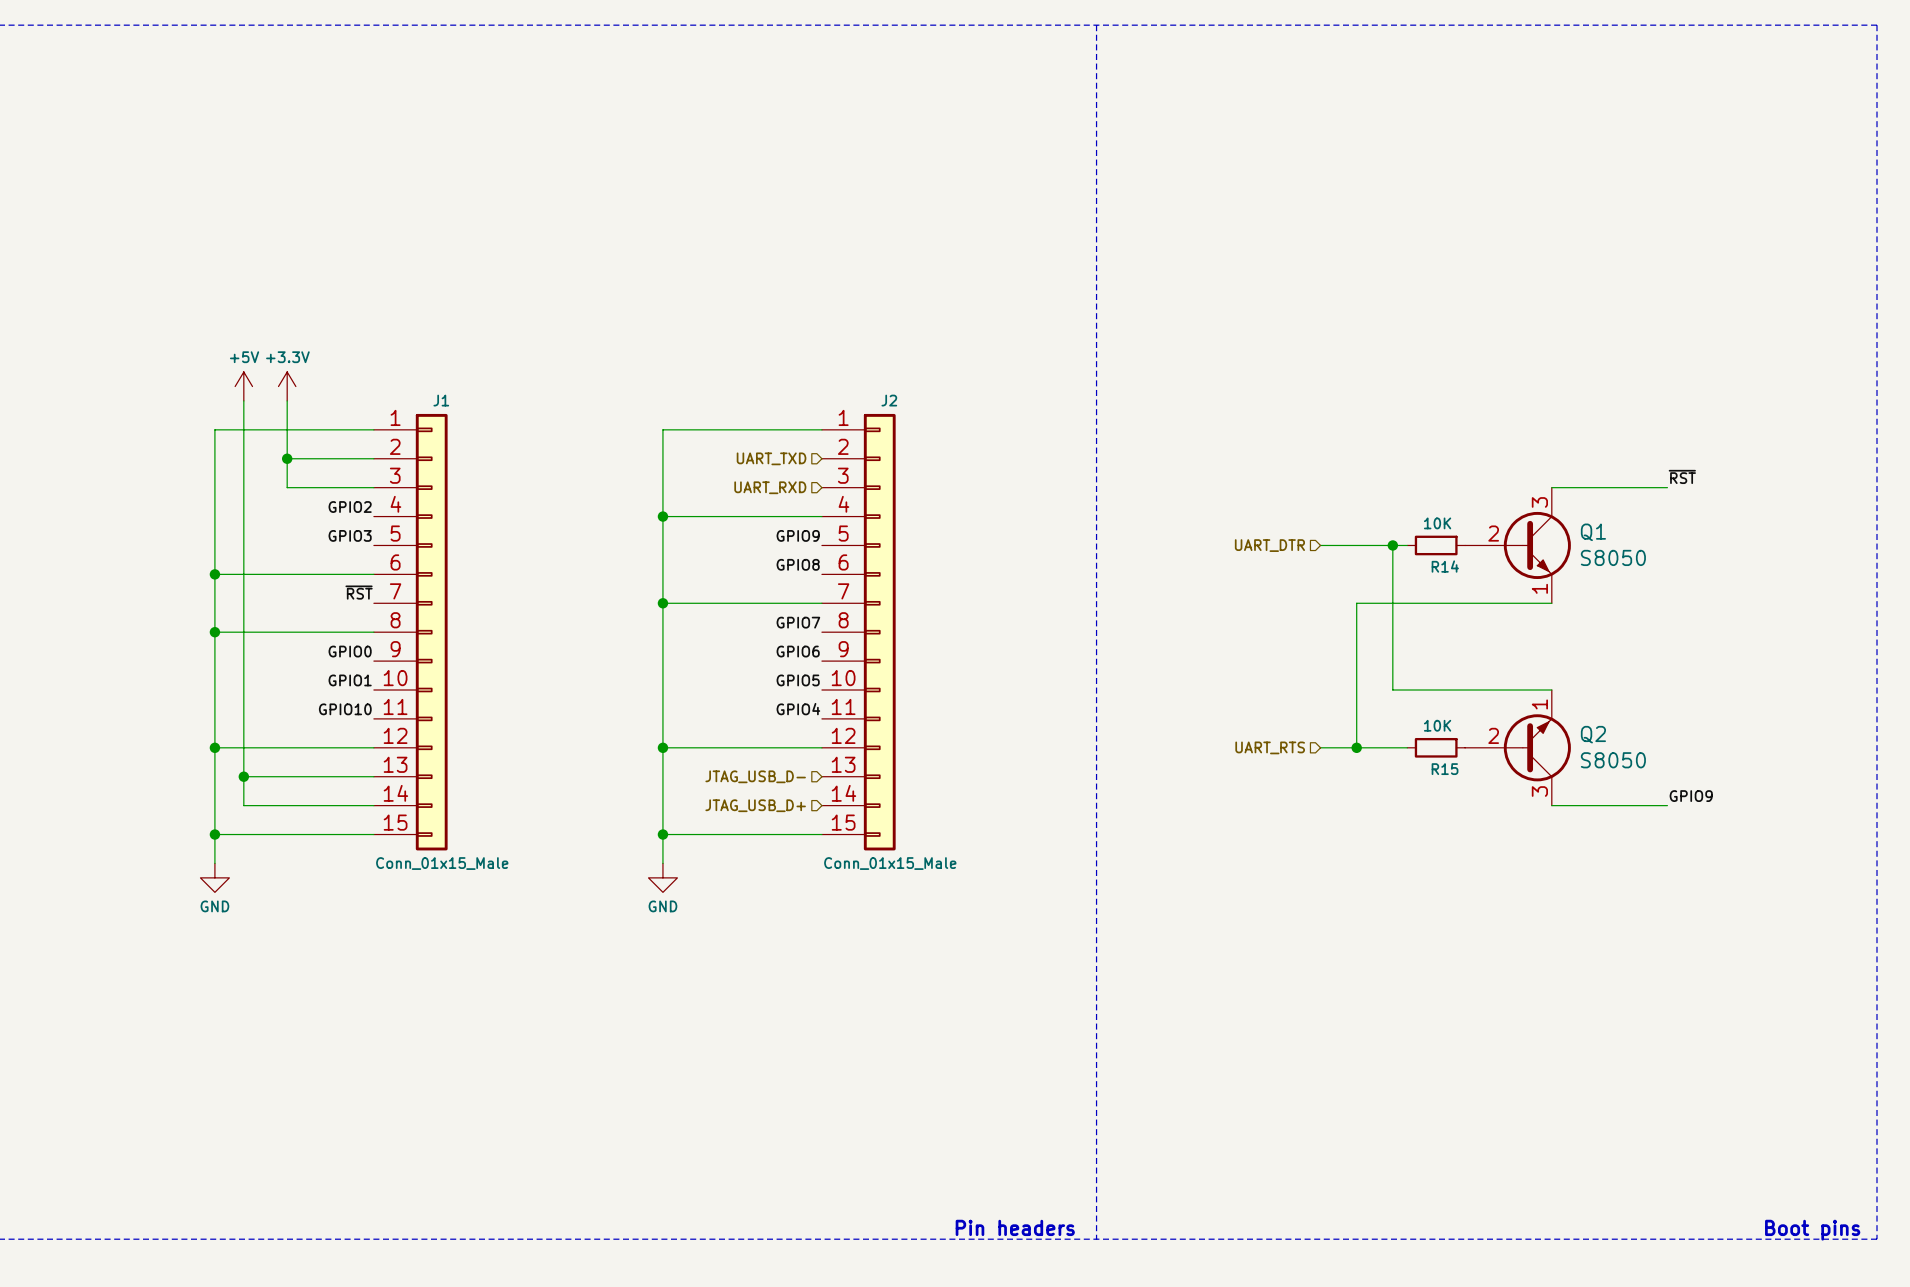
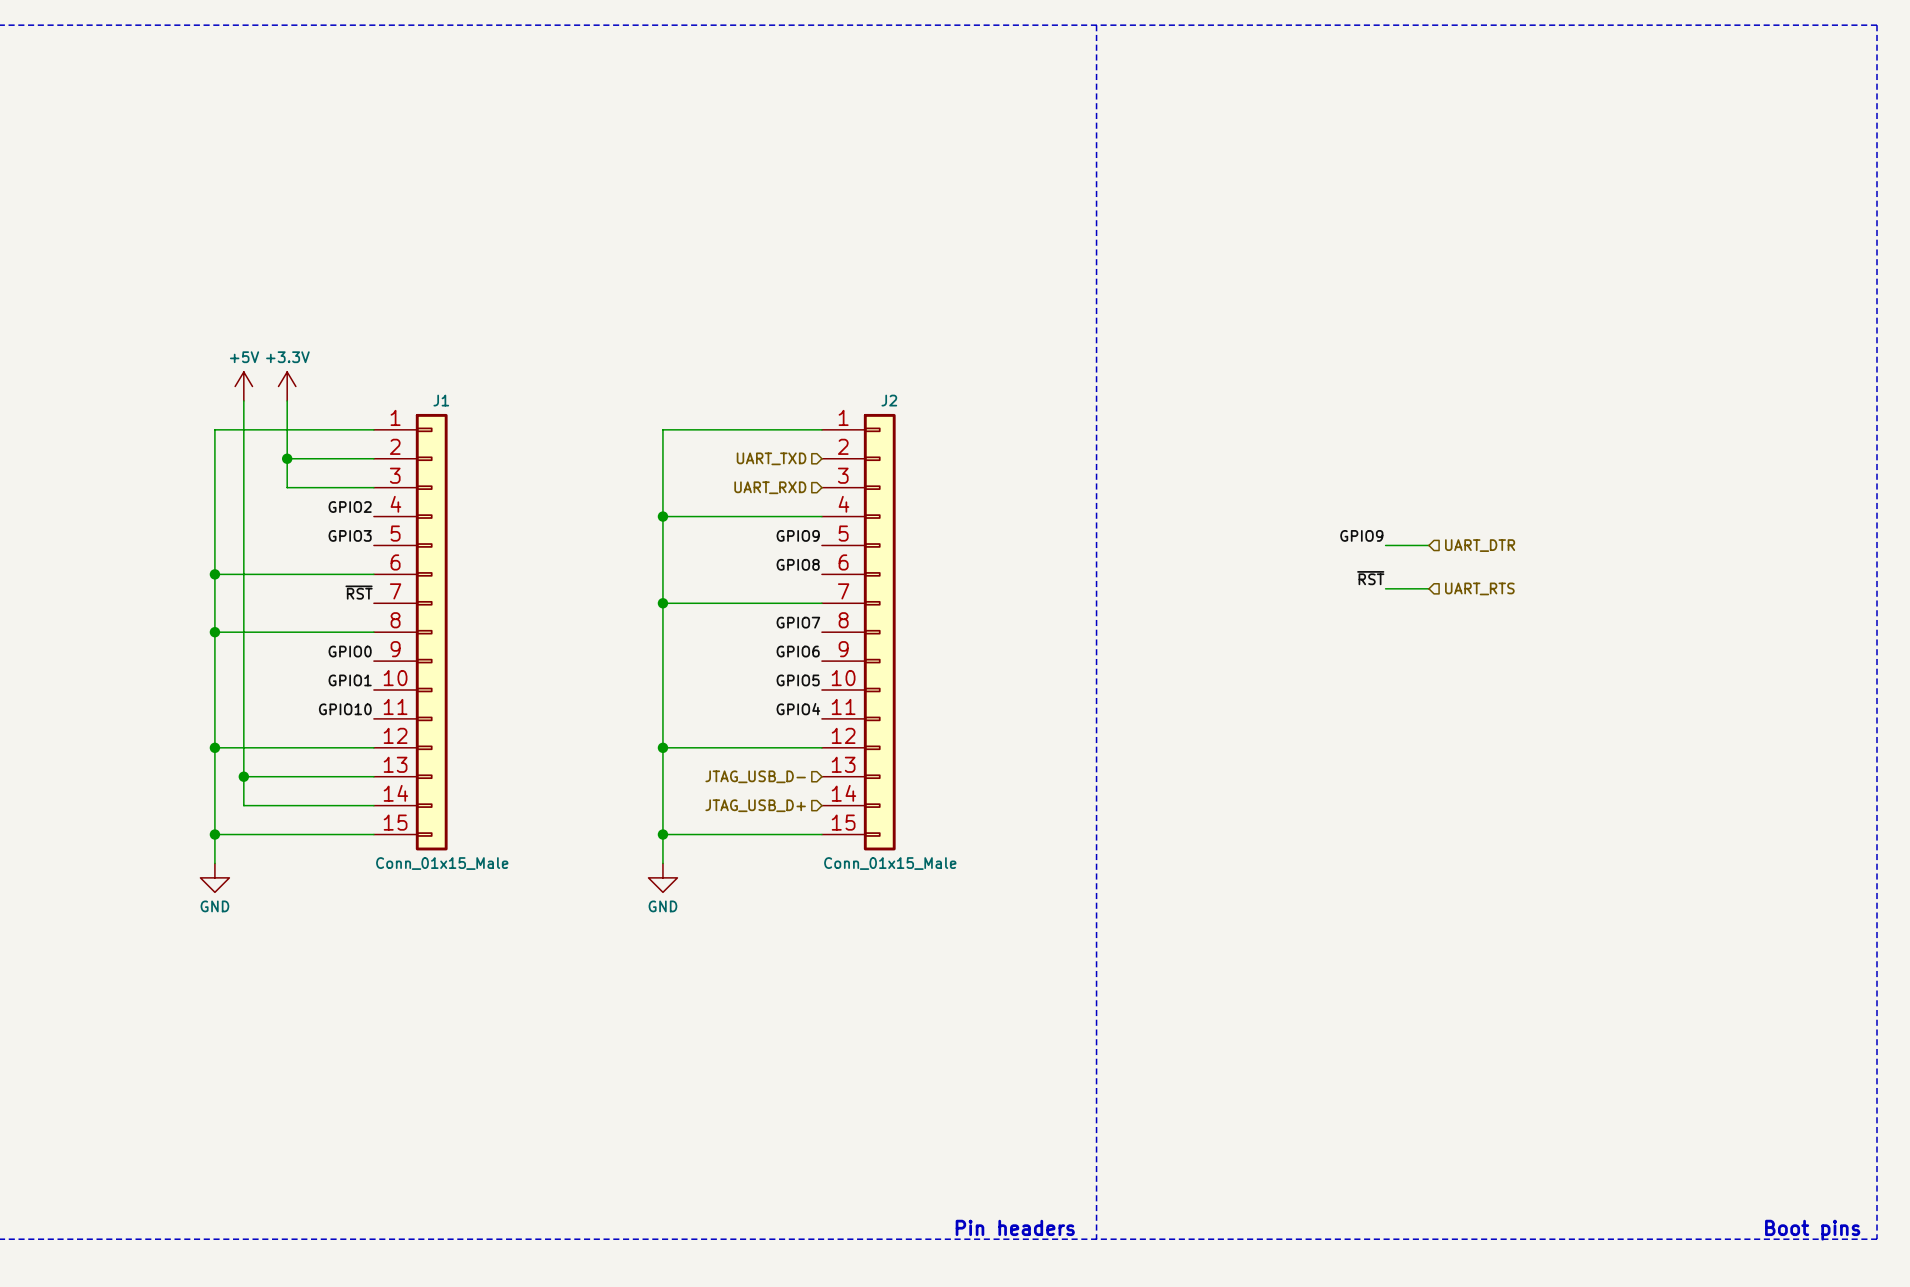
label: ~{RST} (1682, 476) -> none
wire: (1551, 487) (1667, 487) -> none
label: none -> GPIO9 (1361, 535)
hierarchical label rotation: 0° (1269, 545) -> 180° (1480, 545)
hierarchical label position: UART_DTR (1269, 545) -> UART_DTR (1480, 545)
wire: (1320, 545) (1385, 545) -> none
wire: (1392, 545) (1392, 690) (1551, 690) -> none
junction: (1392, 545) -> none
wire: none -> (1407, 545) (1428, 545)
R14: 10K (1436, 545) -> none
Q1: S8050 (1517, 545) -> none
label: none -> ~{RST} (1370, 578)
wire: none -> (1385, 588) (1428, 588)
wire: (1551, 603) (1356, 603) (1356, 747) -> none
hierarchical label rotation: 0° (1270, 747) -> 180° (1479, 588)
hierarchical label position: UART_RTS (1270, 747) -> UART_RTS (1479, 588)
wire: (1320, 747) (1407, 747) -> none
junction: (1356, 747) -> none
R15: 10K (1436, 747) -> none
Q2: S8050 (1517, 747) -> none
label: GPIO9 (1691, 796) -> none
wire: (1551, 805) (1667, 805) -> none

